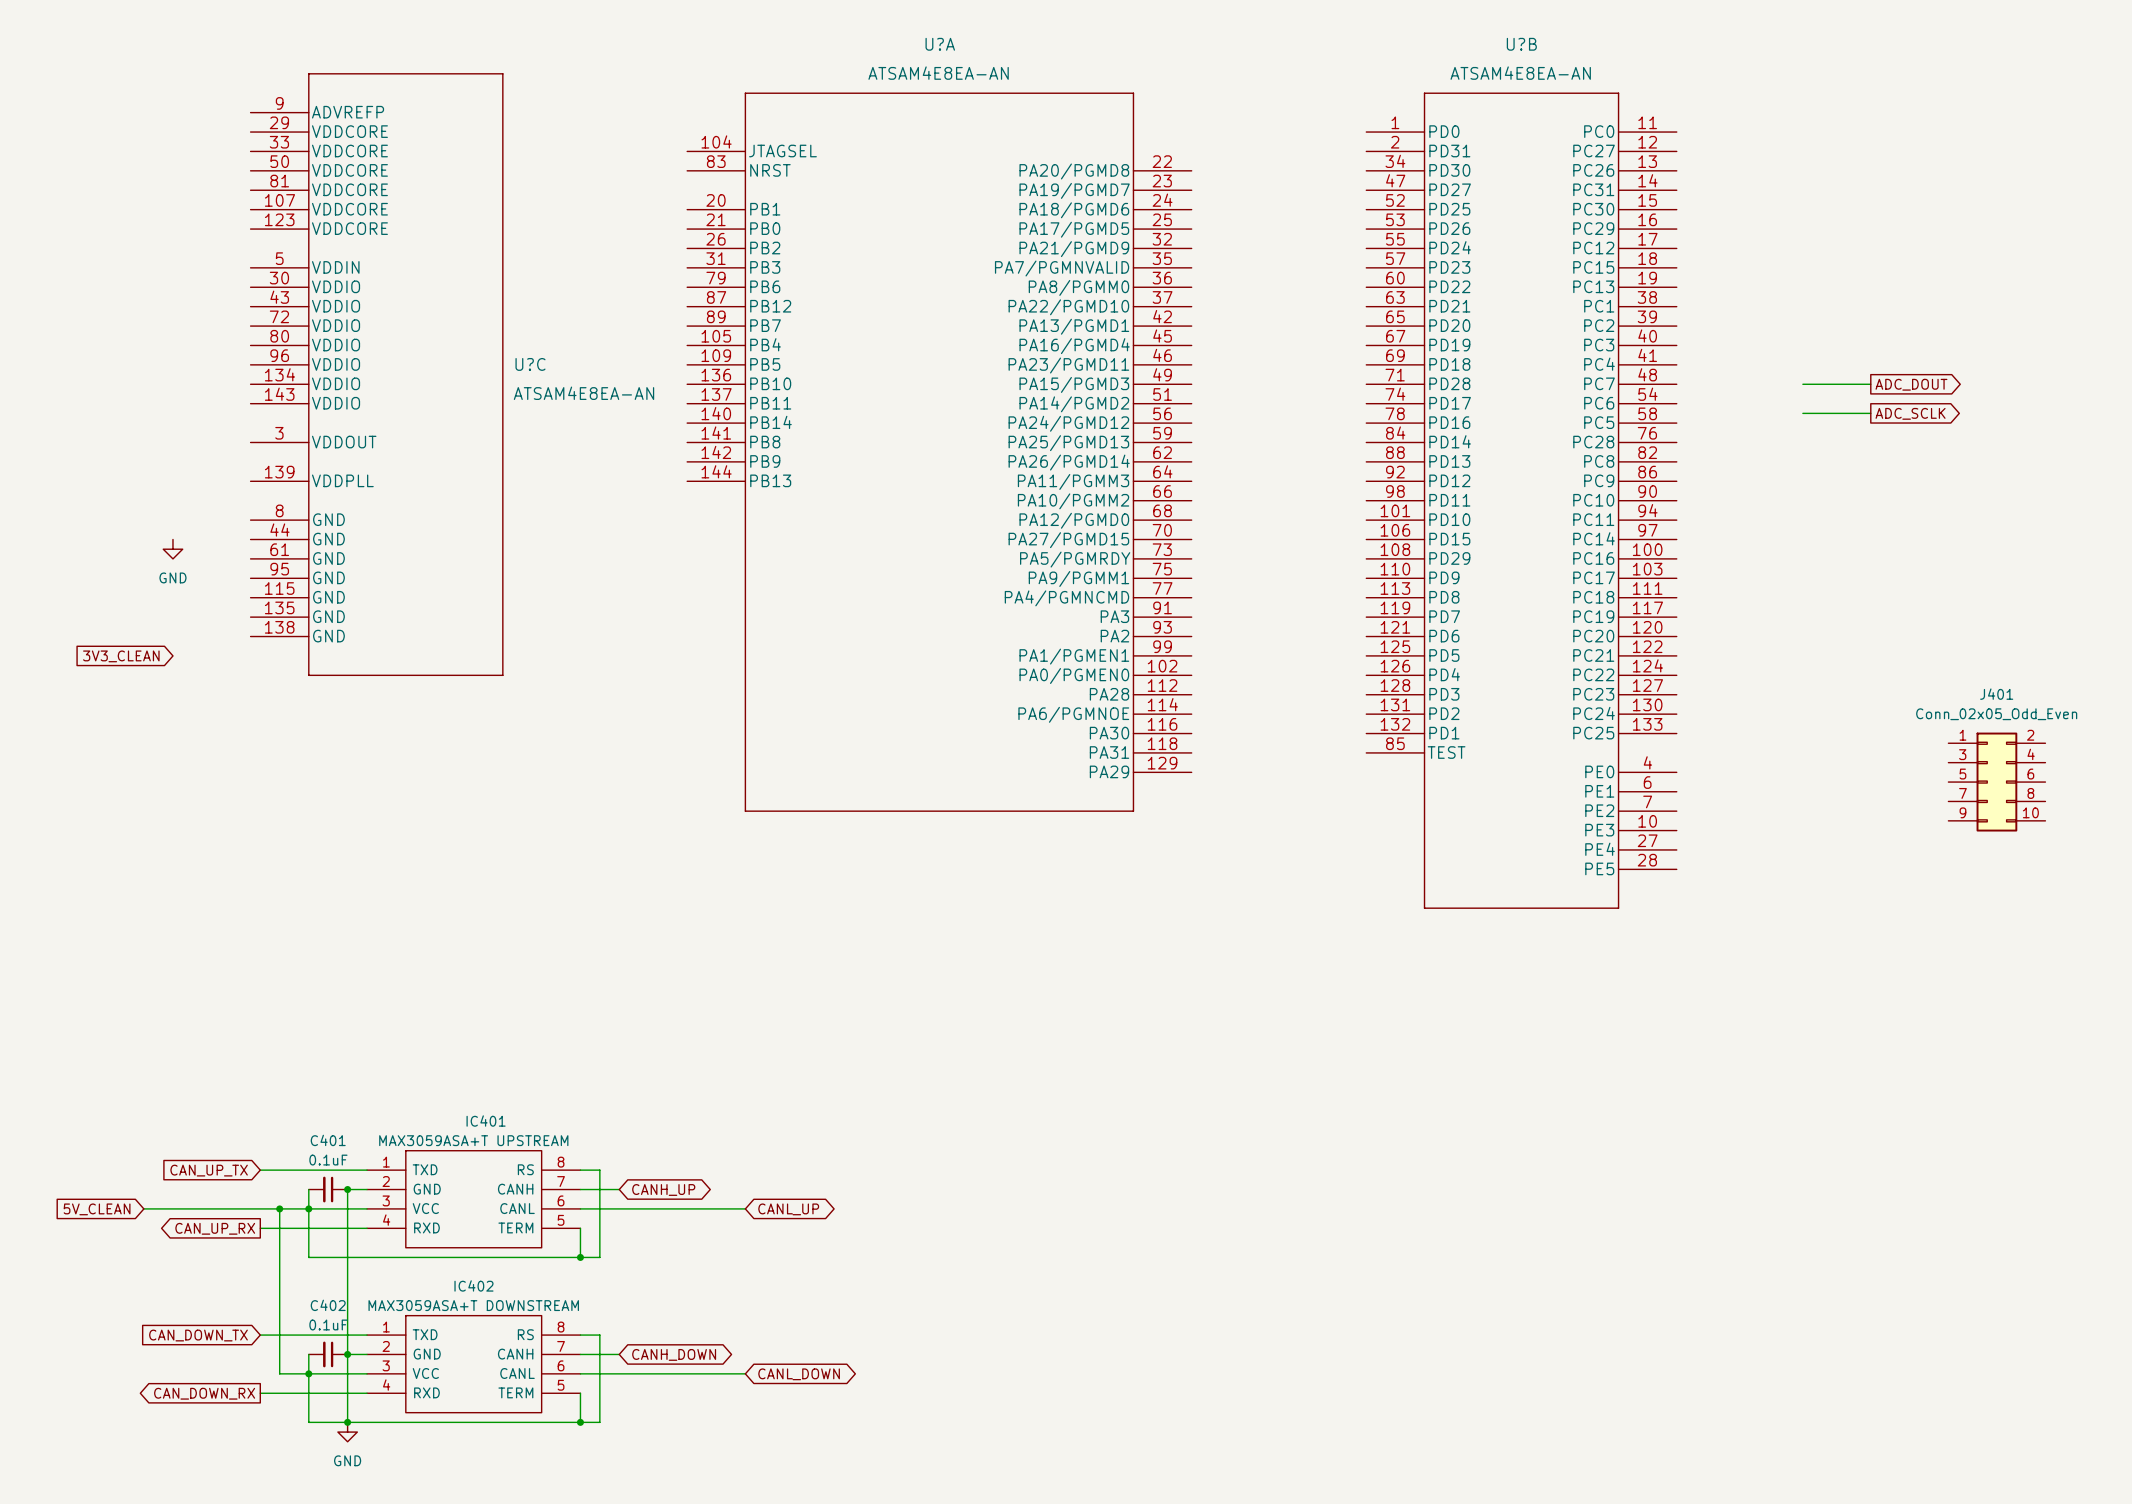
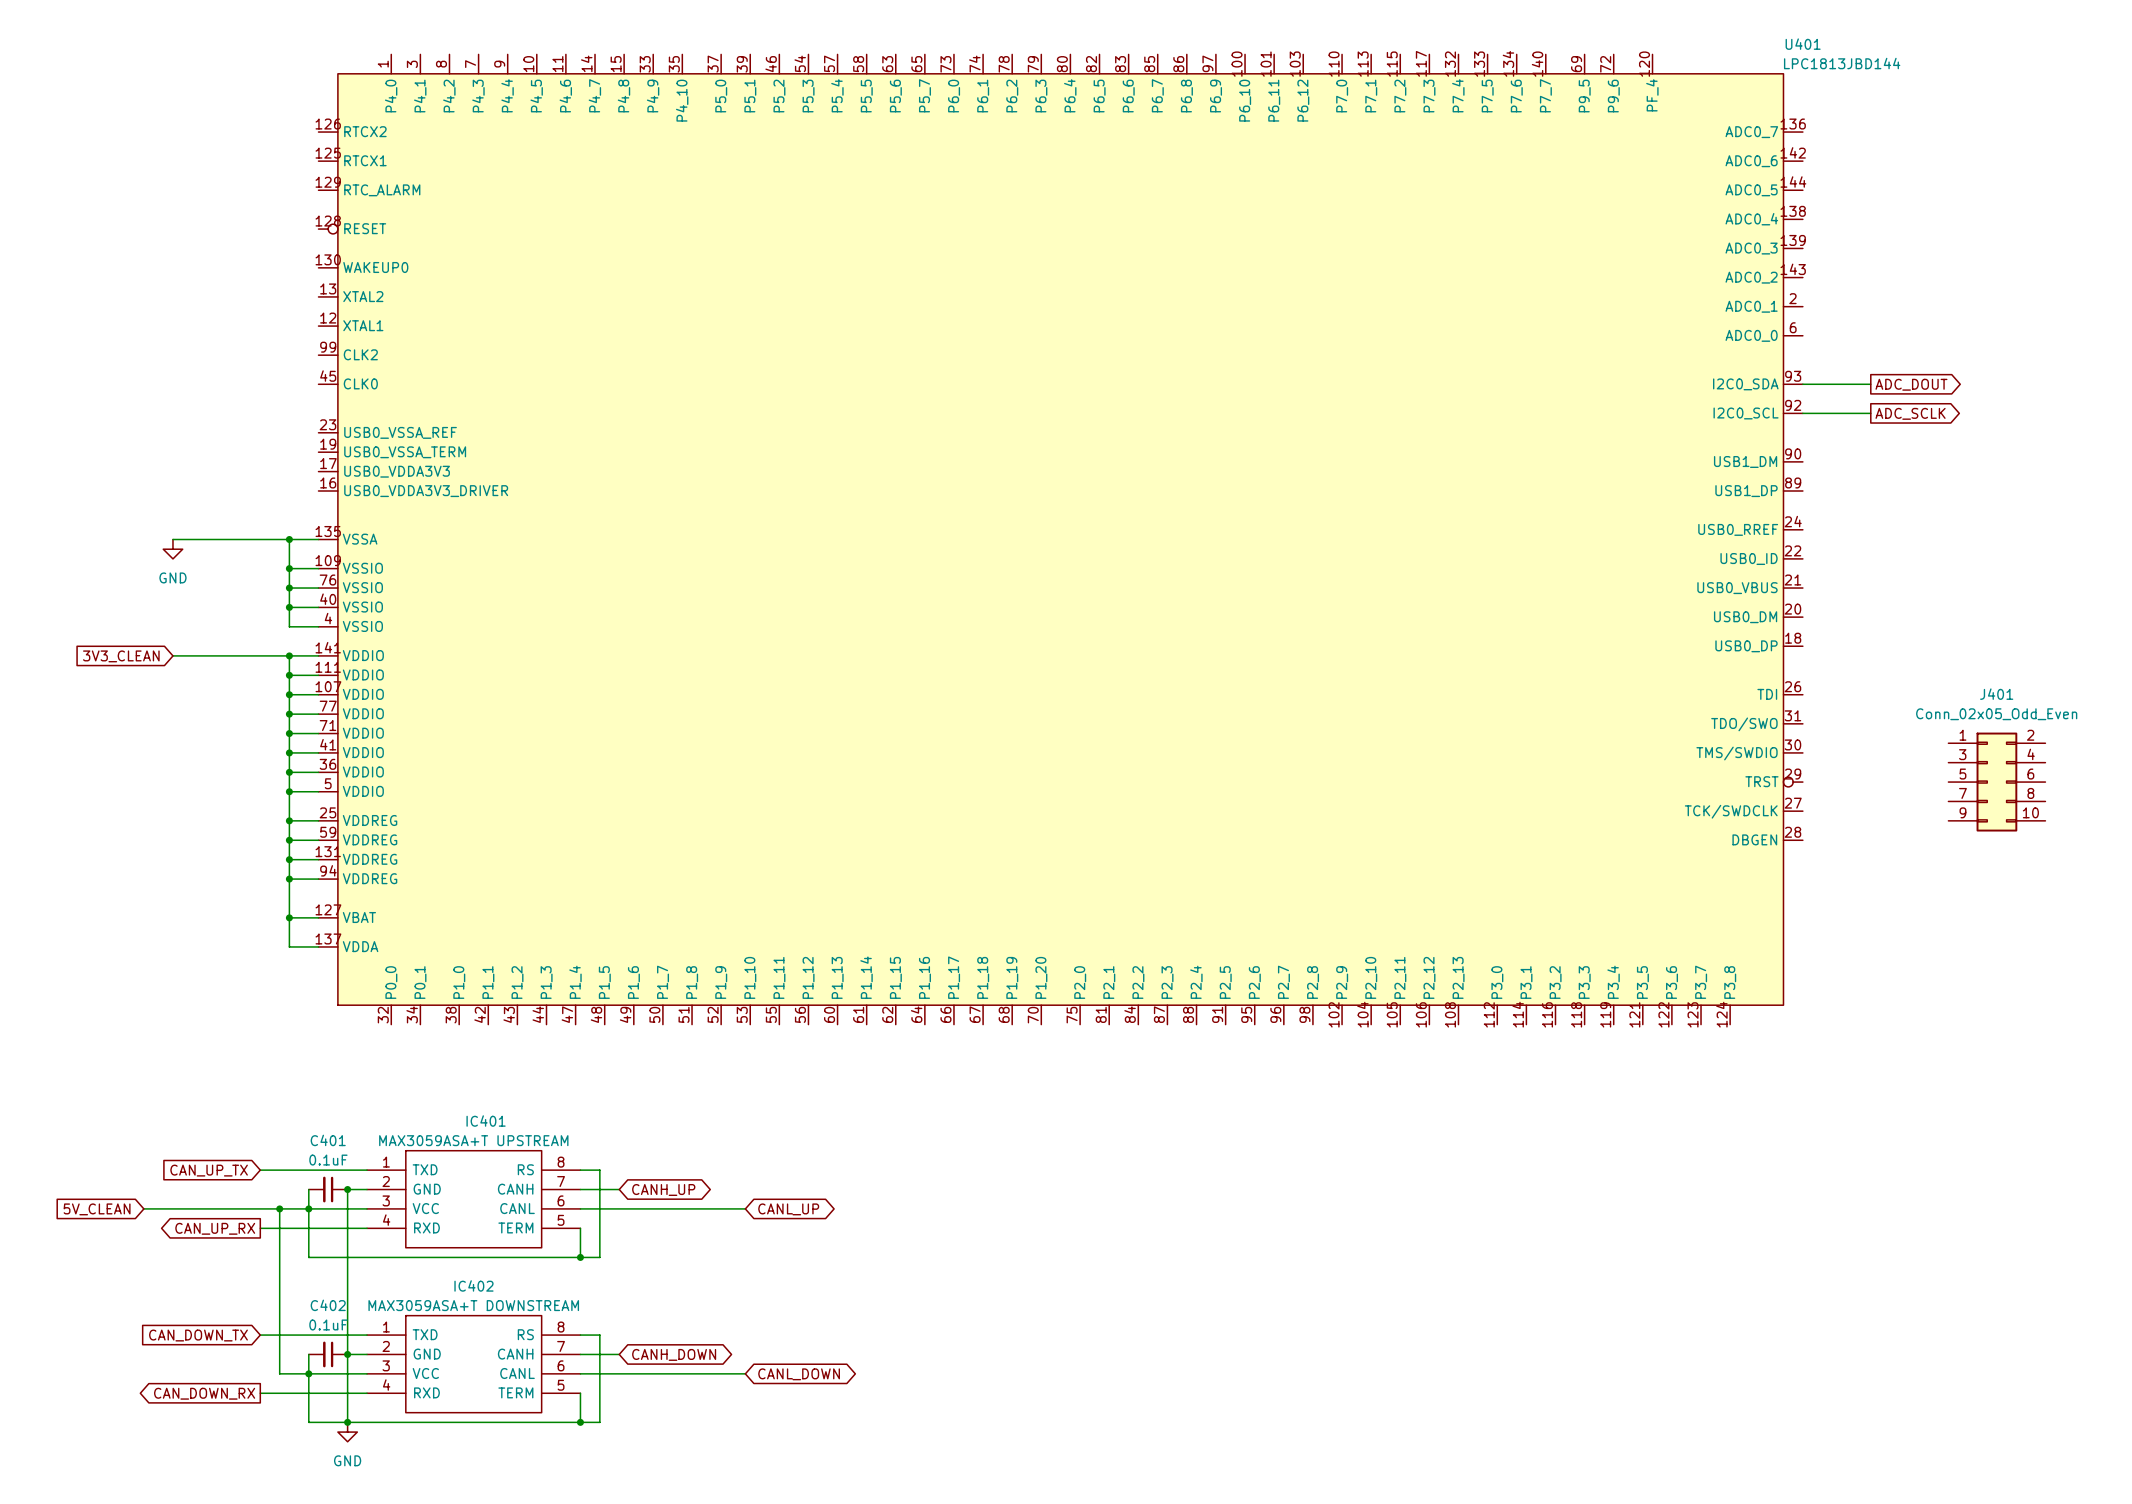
U?C: ATSAM4E8EA-AN (376, 374) -> none
U?A: ATSAM4E8EA-AN (939, 452) -> none
U?B: ATSAM4E8EA-AN (1521, 500) -> none
wire: none -> (172, 539) (318, 539)
wire: none -> (289, 539) (289, 626) (318, 626)
junction: none -> (289, 539)
U401: none -> LPC1813JBD144 (1060, 539)
wire: none -> (289, 568) (318, 568)
junction: none -> (289, 568)
wire: none -> (289, 588) (318, 588)
junction: none -> (289, 588)
wire: none -> (289, 607) (318, 607)
junction: none -> (289, 607)
wire: none -> (172, 655) (318, 655)
wire: none -> (289, 655) (289, 946) (318, 946)
junction: none -> (289, 655)
wire: none -> (289, 675) (318, 675)
junction: none -> (289, 675)
wire: none -> (289, 694) (318, 694)
junction: none -> (289, 694)
wire: none -> (289, 714) (318, 714)
junction: none -> (289, 714)
wire: none -> (289, 733) (318, 733)
junction: none -> (289, 733)
wire: none -> (289, 752) (318, 752)
junction: none -> (289, 752)
wire: none -> (289, 772) (318, 772)
junction: none -> (289, 772)
wire: none -> (289, 791) (318, 791)
junction: none -> (289, 791)
wire: none -> (289, 820) (318, 820)
junction: none -> (289, 820)
wire: none -> (289, 840) (318, 840)
junction: none -> (289, 840)
wire: none -> (289, 859) (318, 859)
junction: none -> (289, 859)
wire: none -> (289, 879) (318, 879)
junction: none -> (289, 879)
wire: none -> (289, 917) (318, 917)
junction: none -> (289, 917)

